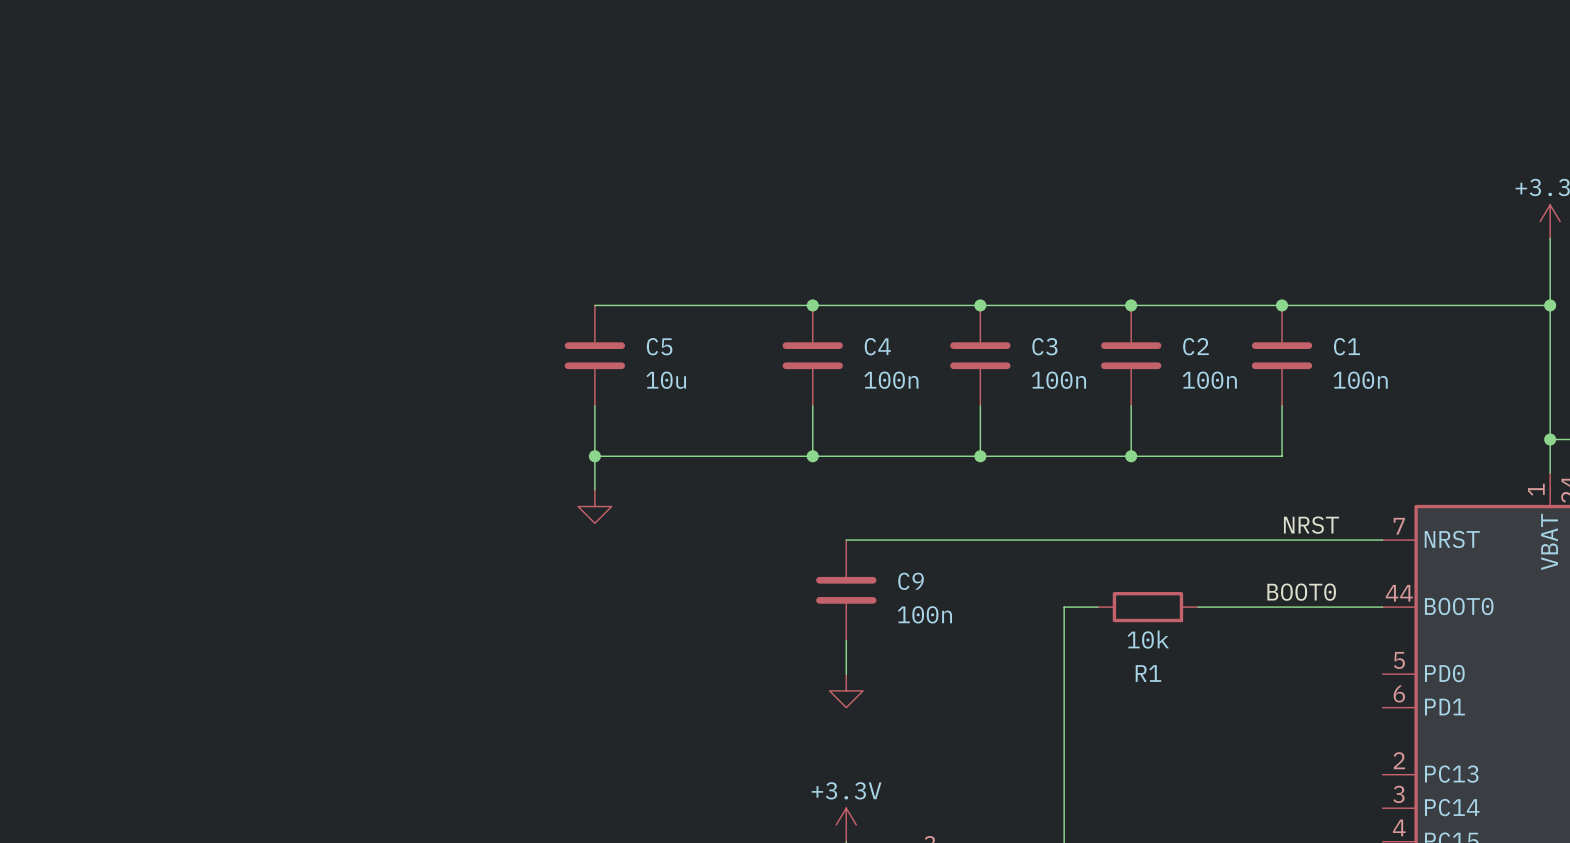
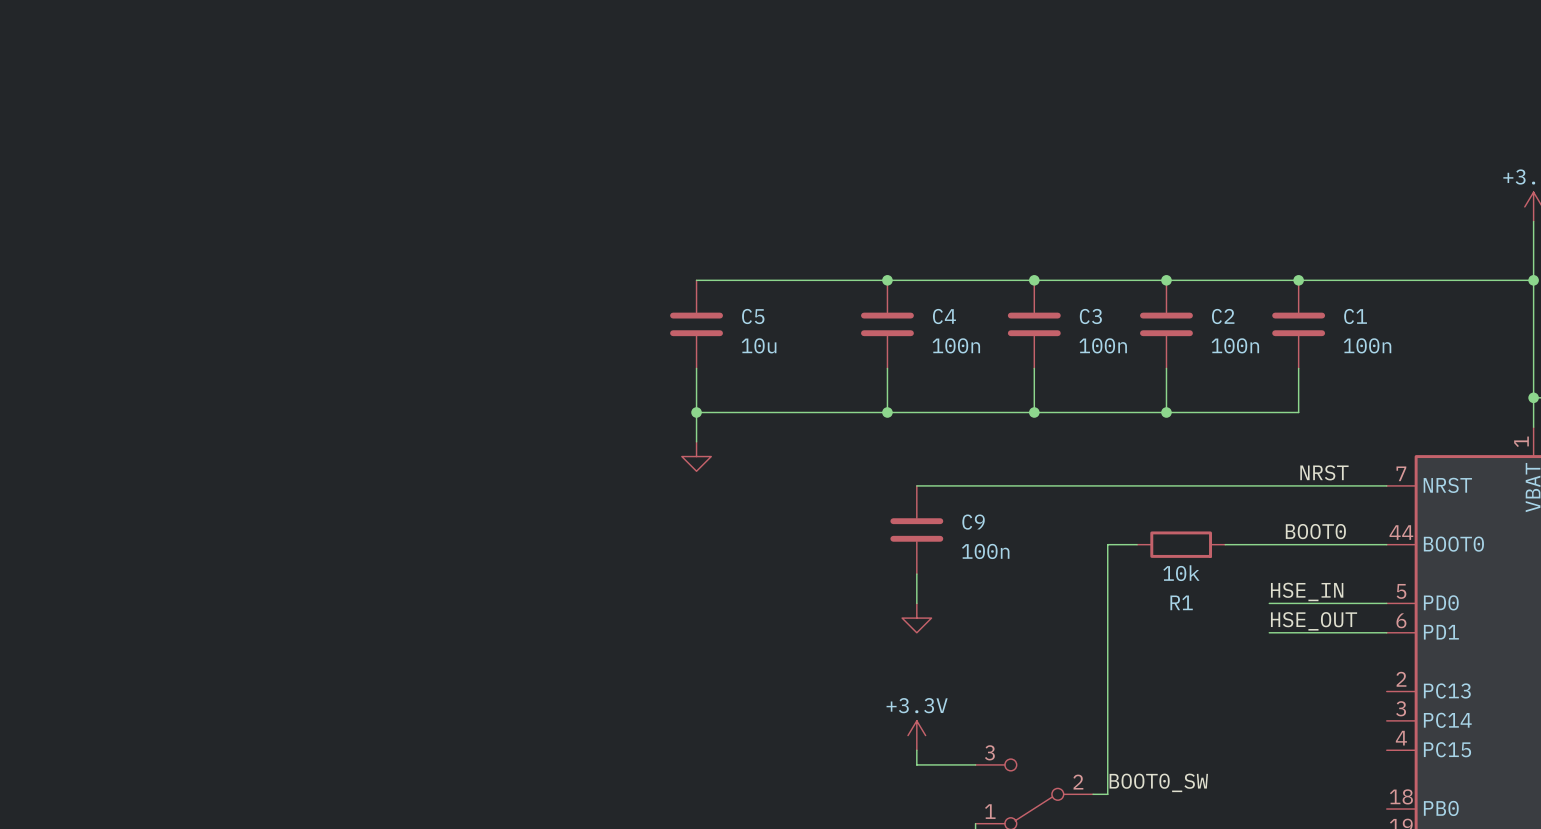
label: none -> HSE_IN (1307, 591)
wire: none -> (1269, 603) (1386, 603)
label: none -> HSE_OUT (1314, 621)
wire: none -> (1269, 632) (1386, 632)

